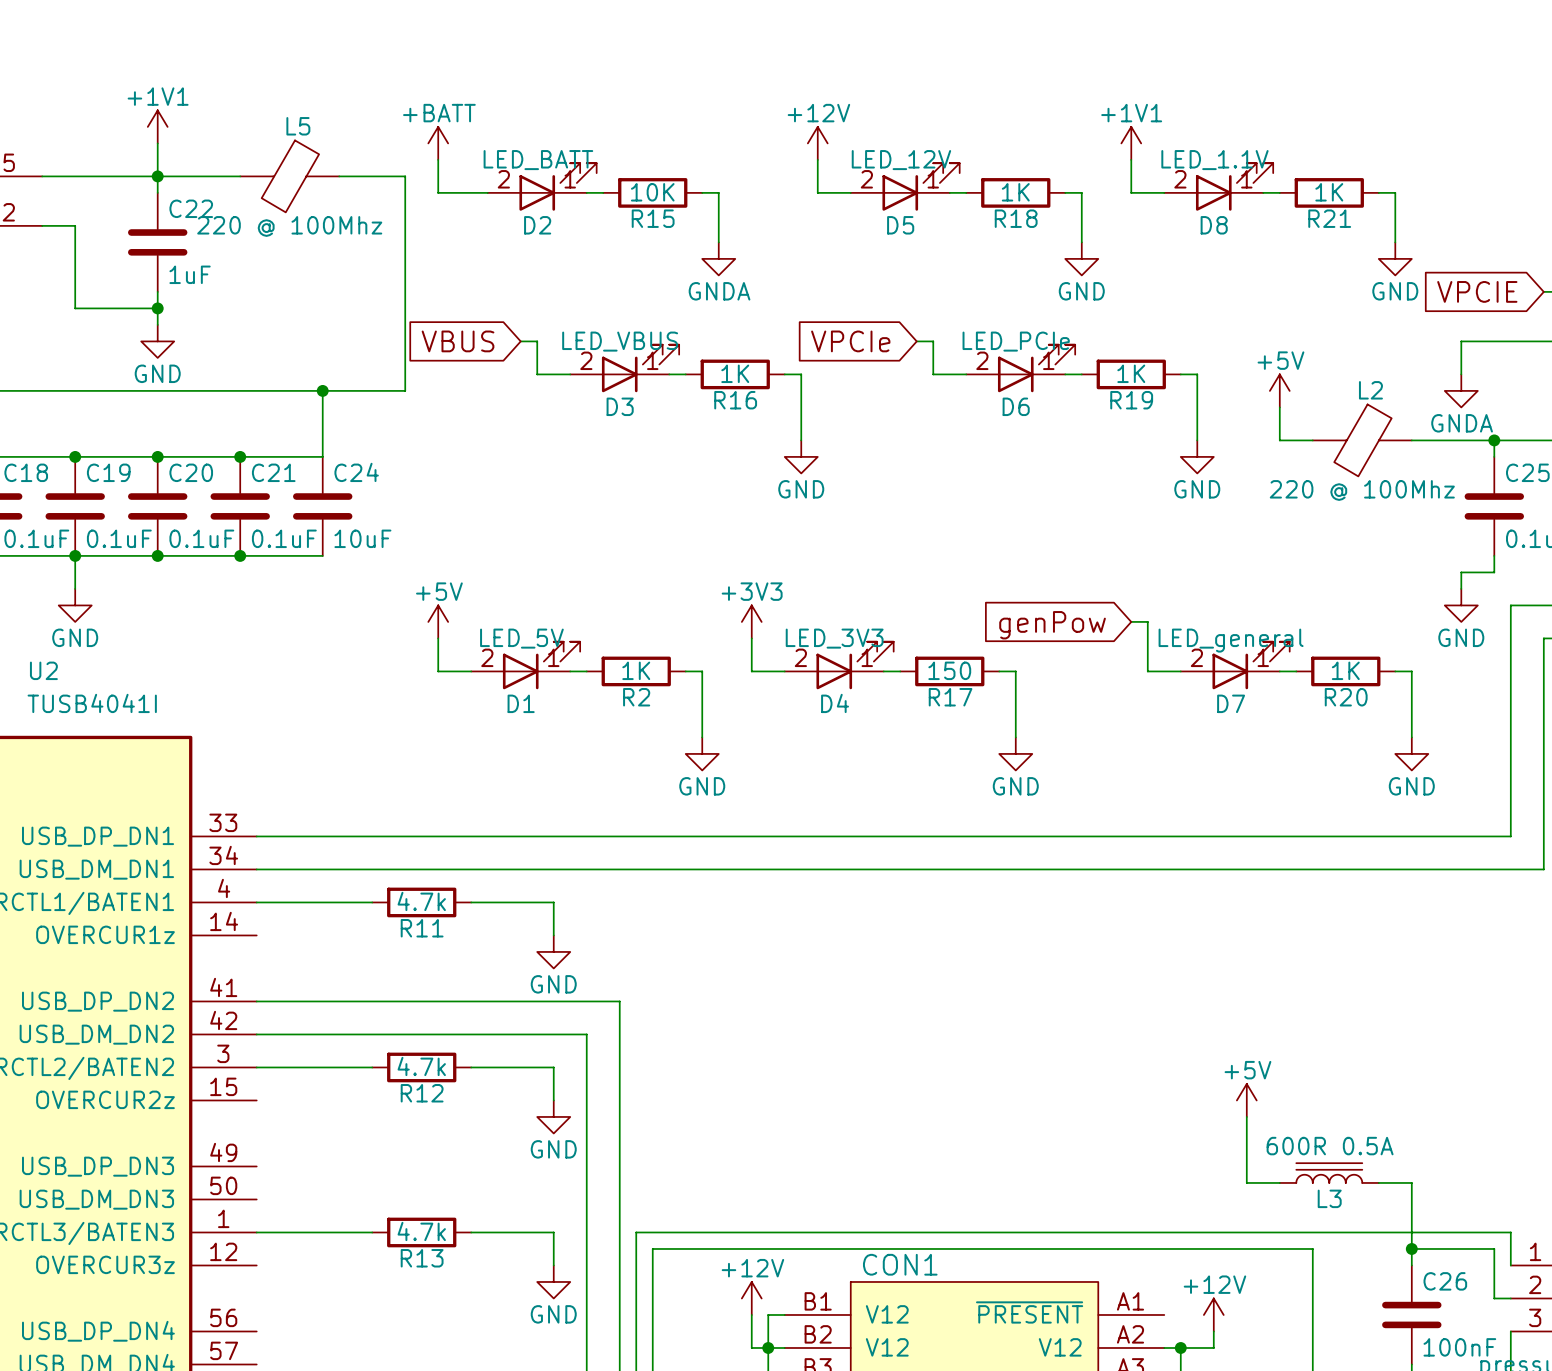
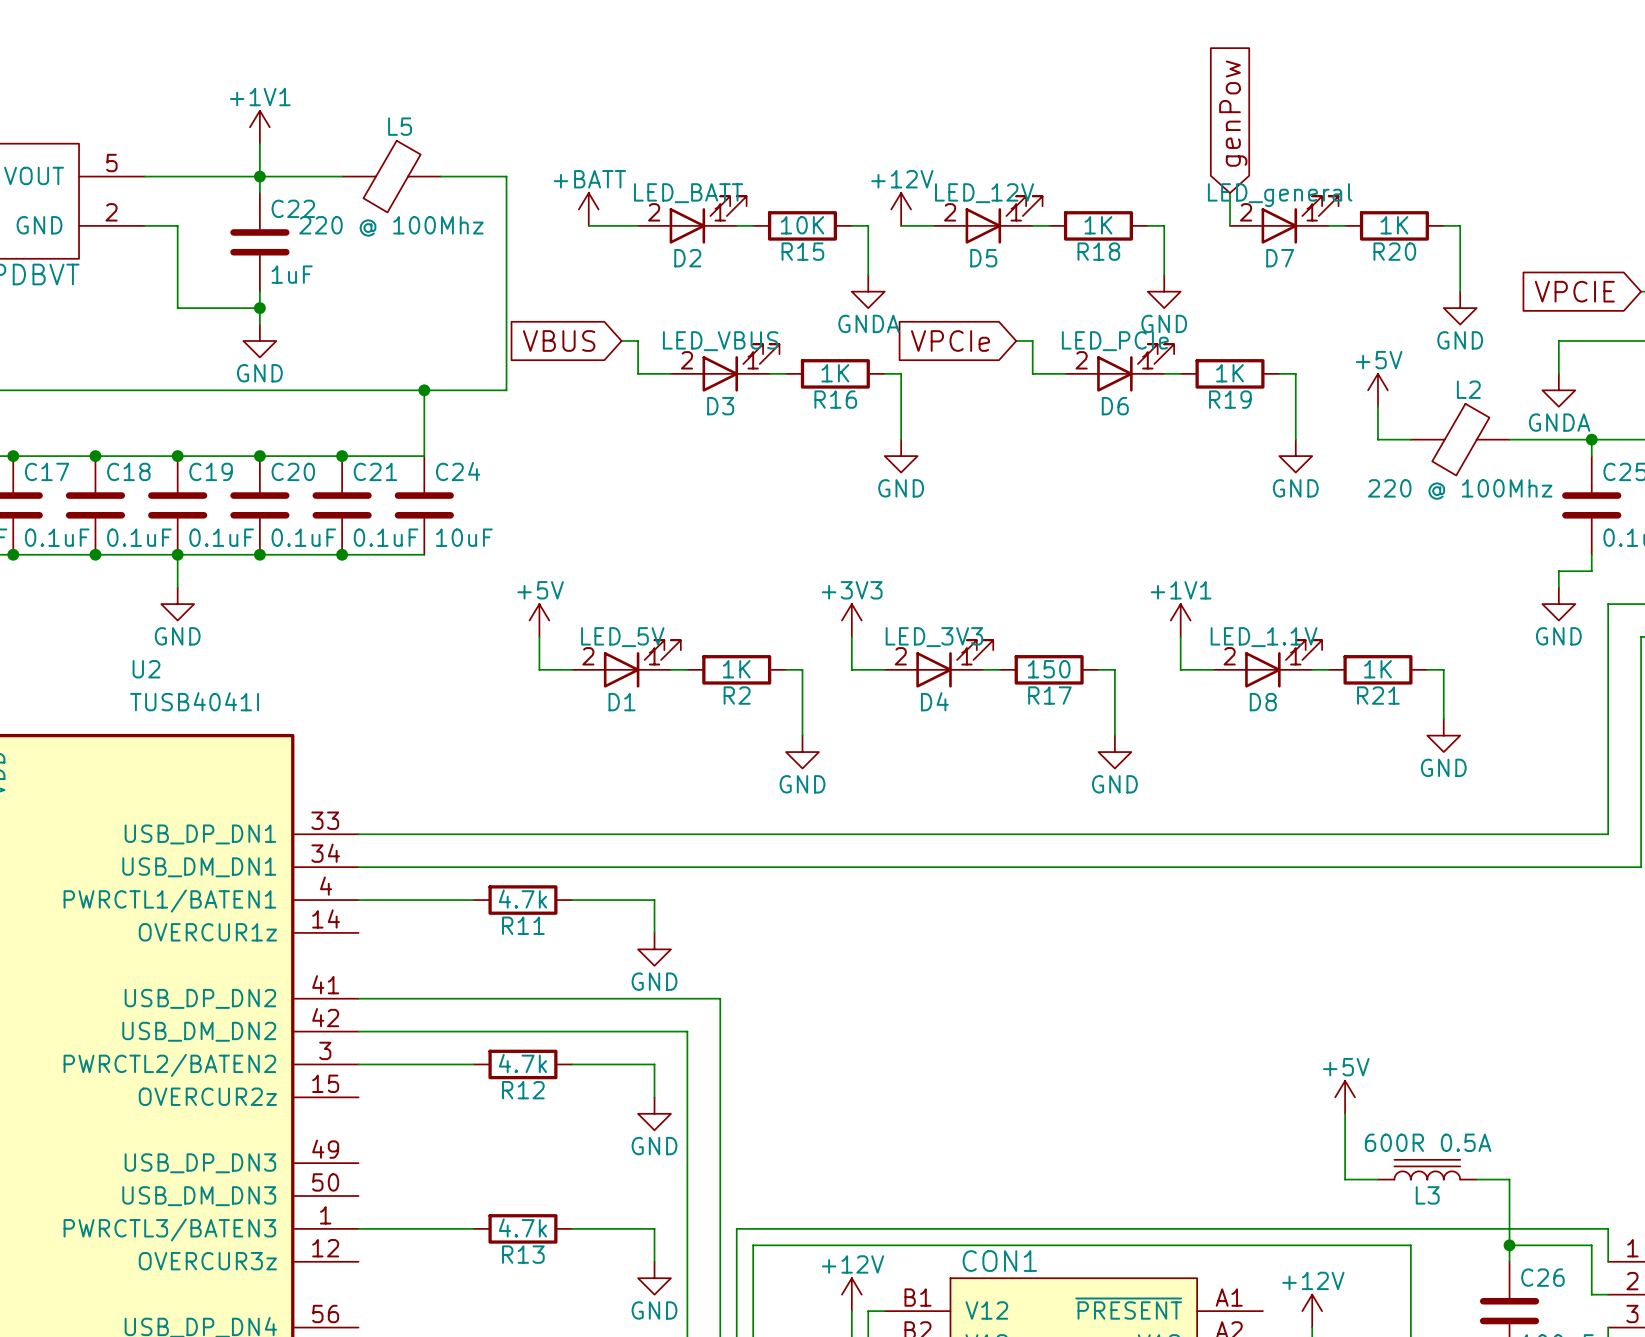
global label: none -> genPow (1233, 113)
power symbol position: +BATT (438, 143) -> +BATT (588, 209)
power symbol position: +12V (817, 143) -> +12V (901, 209)
power symbol: +1V1 (1131, 143) -> none
wire: (438, 159) (438, 192) (487, 192) -> none
wire: (817, 159) (817, 192) (850, 192) -> none
wire: (1131, 159) (1131, 192) (1164, 192) -> none
D2 position: (542, 186) -> (692, 219)
D5 position: (905, 186) -> (988, 219)
D8 position: (1218, 186) -> (1267, 663)
wire: (586, 192) (603, 192) -> (736, 225) (753, 225)
R15 position: (652, 192) -> (802, 225)
wire: (702, 192) (718, 192) (718, 242) -> (851, 225) (868, 225) (868, 275)
wire: (949, 192) (966, 192) -> (1032, 225) (1049, 225)
R18 position: (1015, 192) -> (1098, 225)
wire: (1065, 192) (1081, 192) (1081, 242) -> (1147, 225) (1164, 225) (1164, 275)
wire: none -> (1230, 193) (1230, 225)
wire: (1263, 192) (1279, 192) -> (1328, 225) (1345, 225)
R21 position: (1329, 192) -> (1377, 669)
wire: (1378, 192) (1395, 192) (1395, 242) -> none
wire: none -> (588, 225) (638, 225)
wire: none -> (901, 225) (934, 225)
wire: none -> (1443, 225) (1460, 225) (1460, 291)
power symbol position: GNDA (718, 258) -> GNDA (868, 291)
power symbol position: GND (1081, 258) -> GND (1164, 291)
power symbol position: GND (1395, 258) -> GND (1460, 308)
power symbol: none -> +1V1 (1180, 620)
wire: (1131, 621) (1147, 621) (1147, 671) (1180, 671) -> none
global label: genPow (1052, 625) -> none
wire: none -> (1180, 636) (1180, 669) (1213, 669)
D7 position: (1235, 665) -> (1284, 219)
wire: none -> (1427, 669) (1443, 669) (1443, 719)
R20 position: (1345, 671) -> (1394, 225)
wire: (1395, 671) (1411, 671) (1411, 737) -> none
power symbol position: GND (1411, 753) -> GND (1443, 735)

